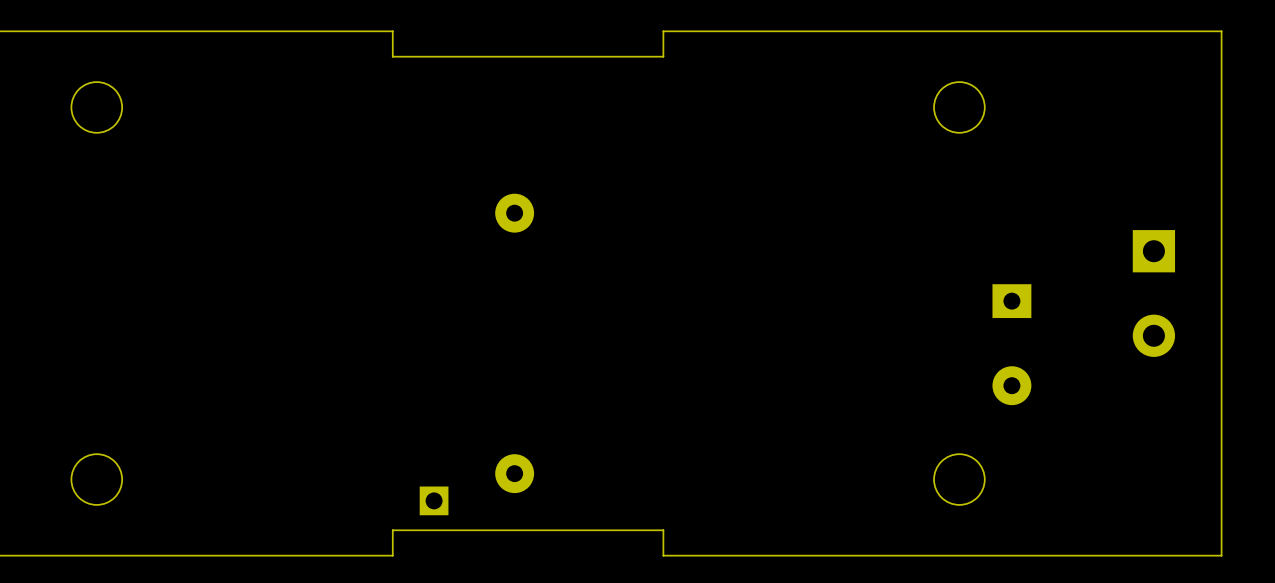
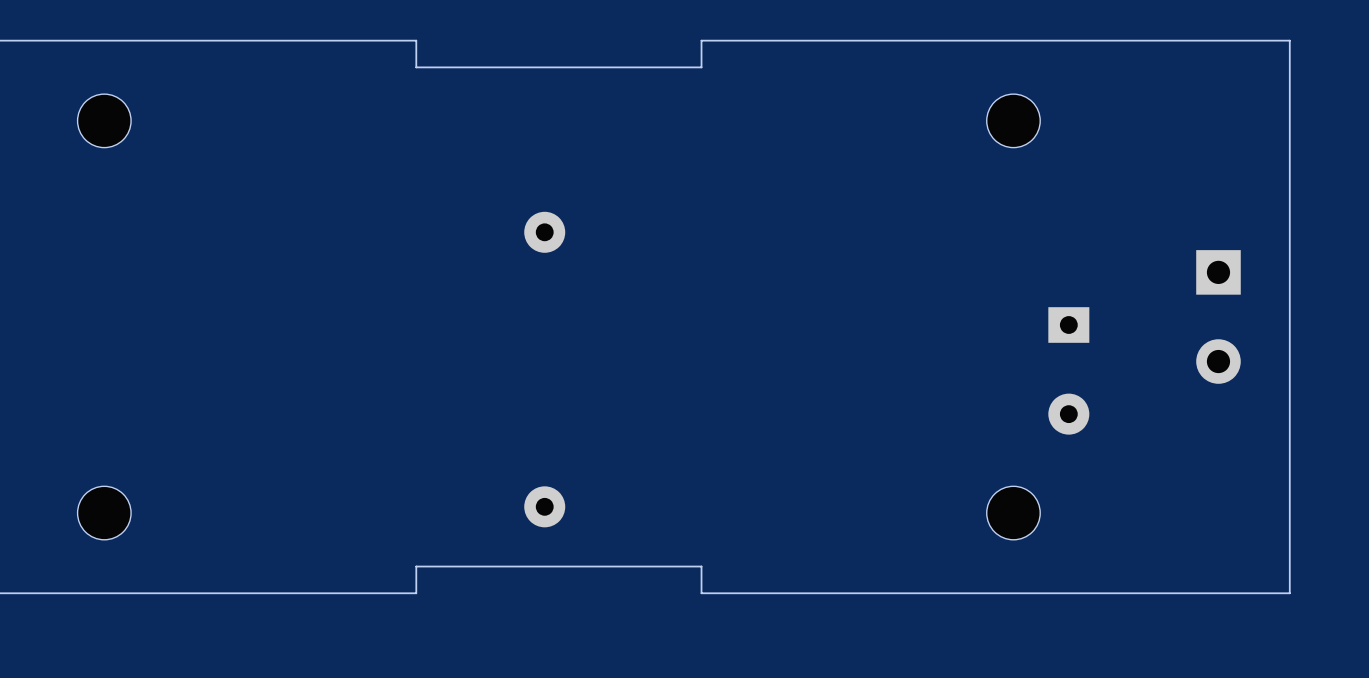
part: (434, 500) -> none

